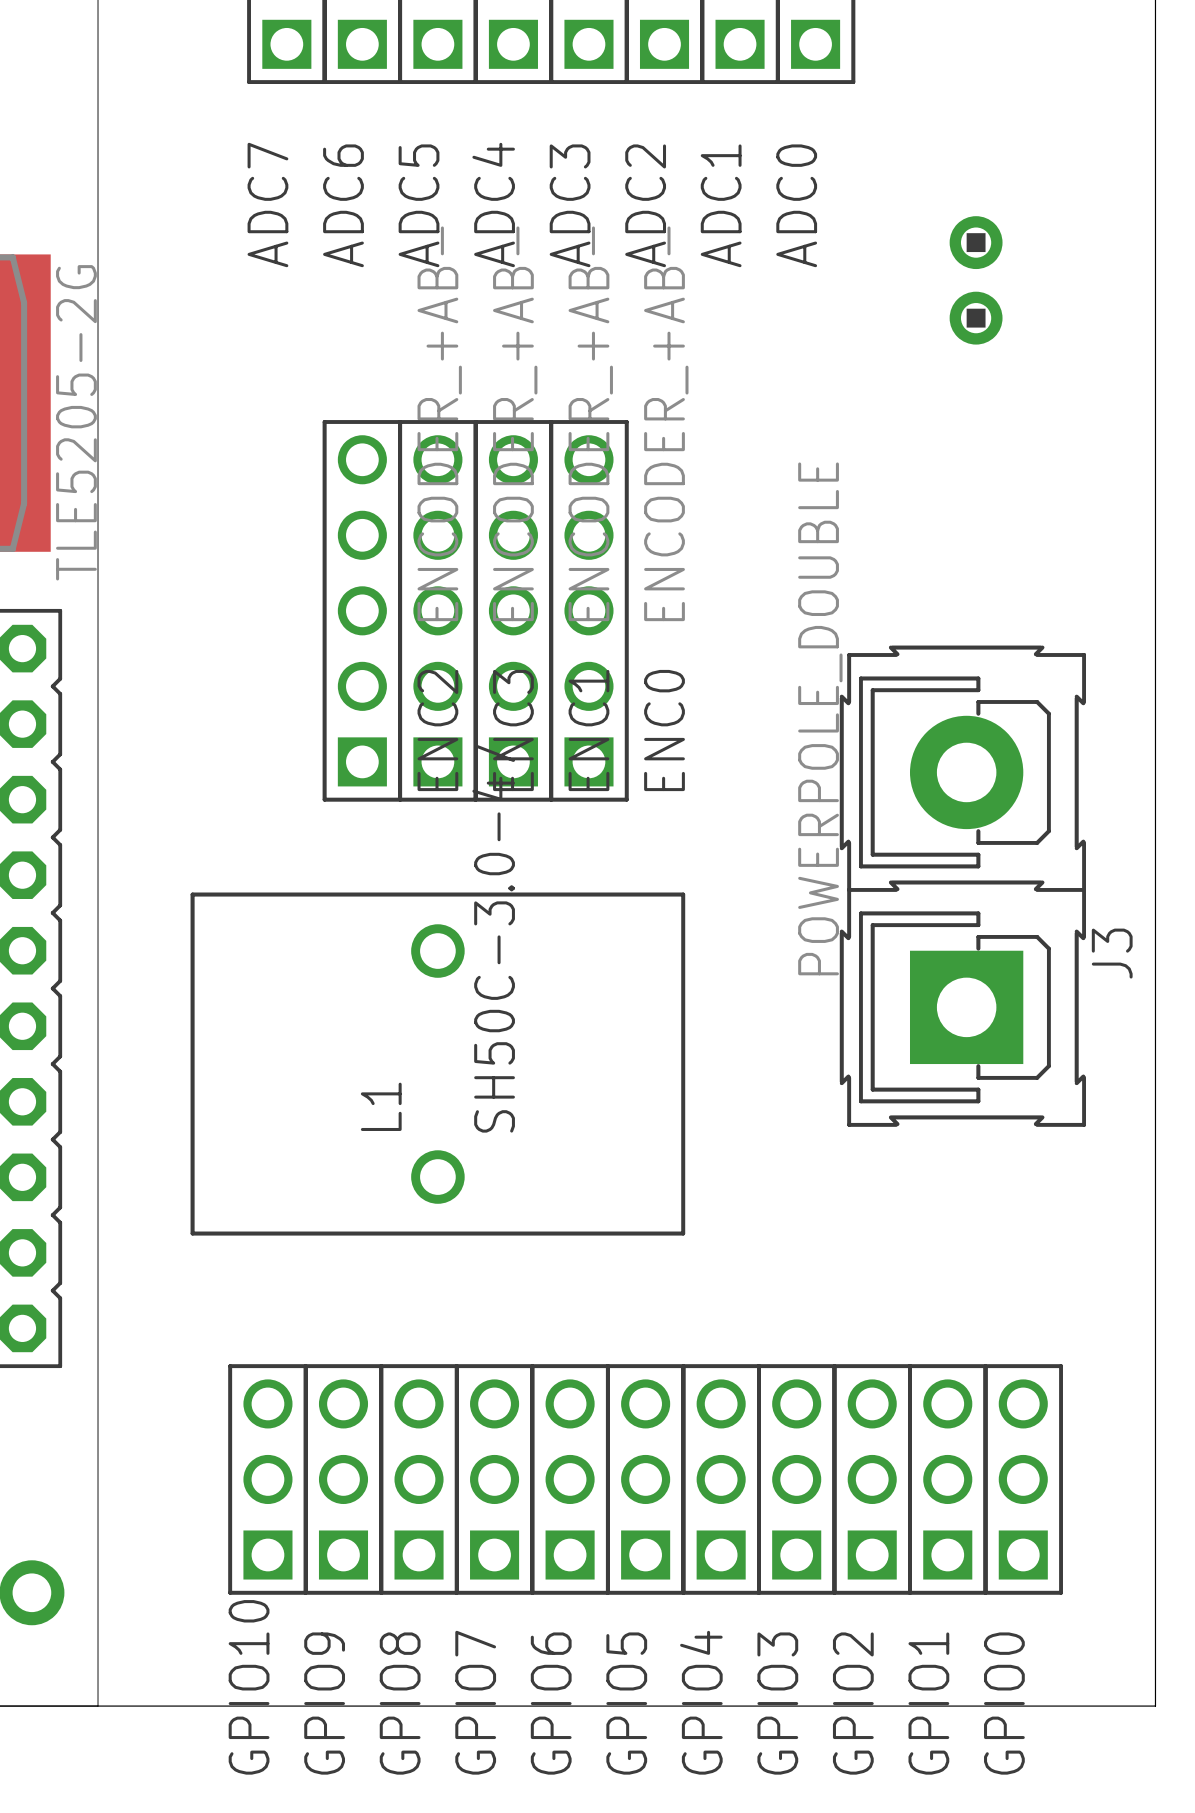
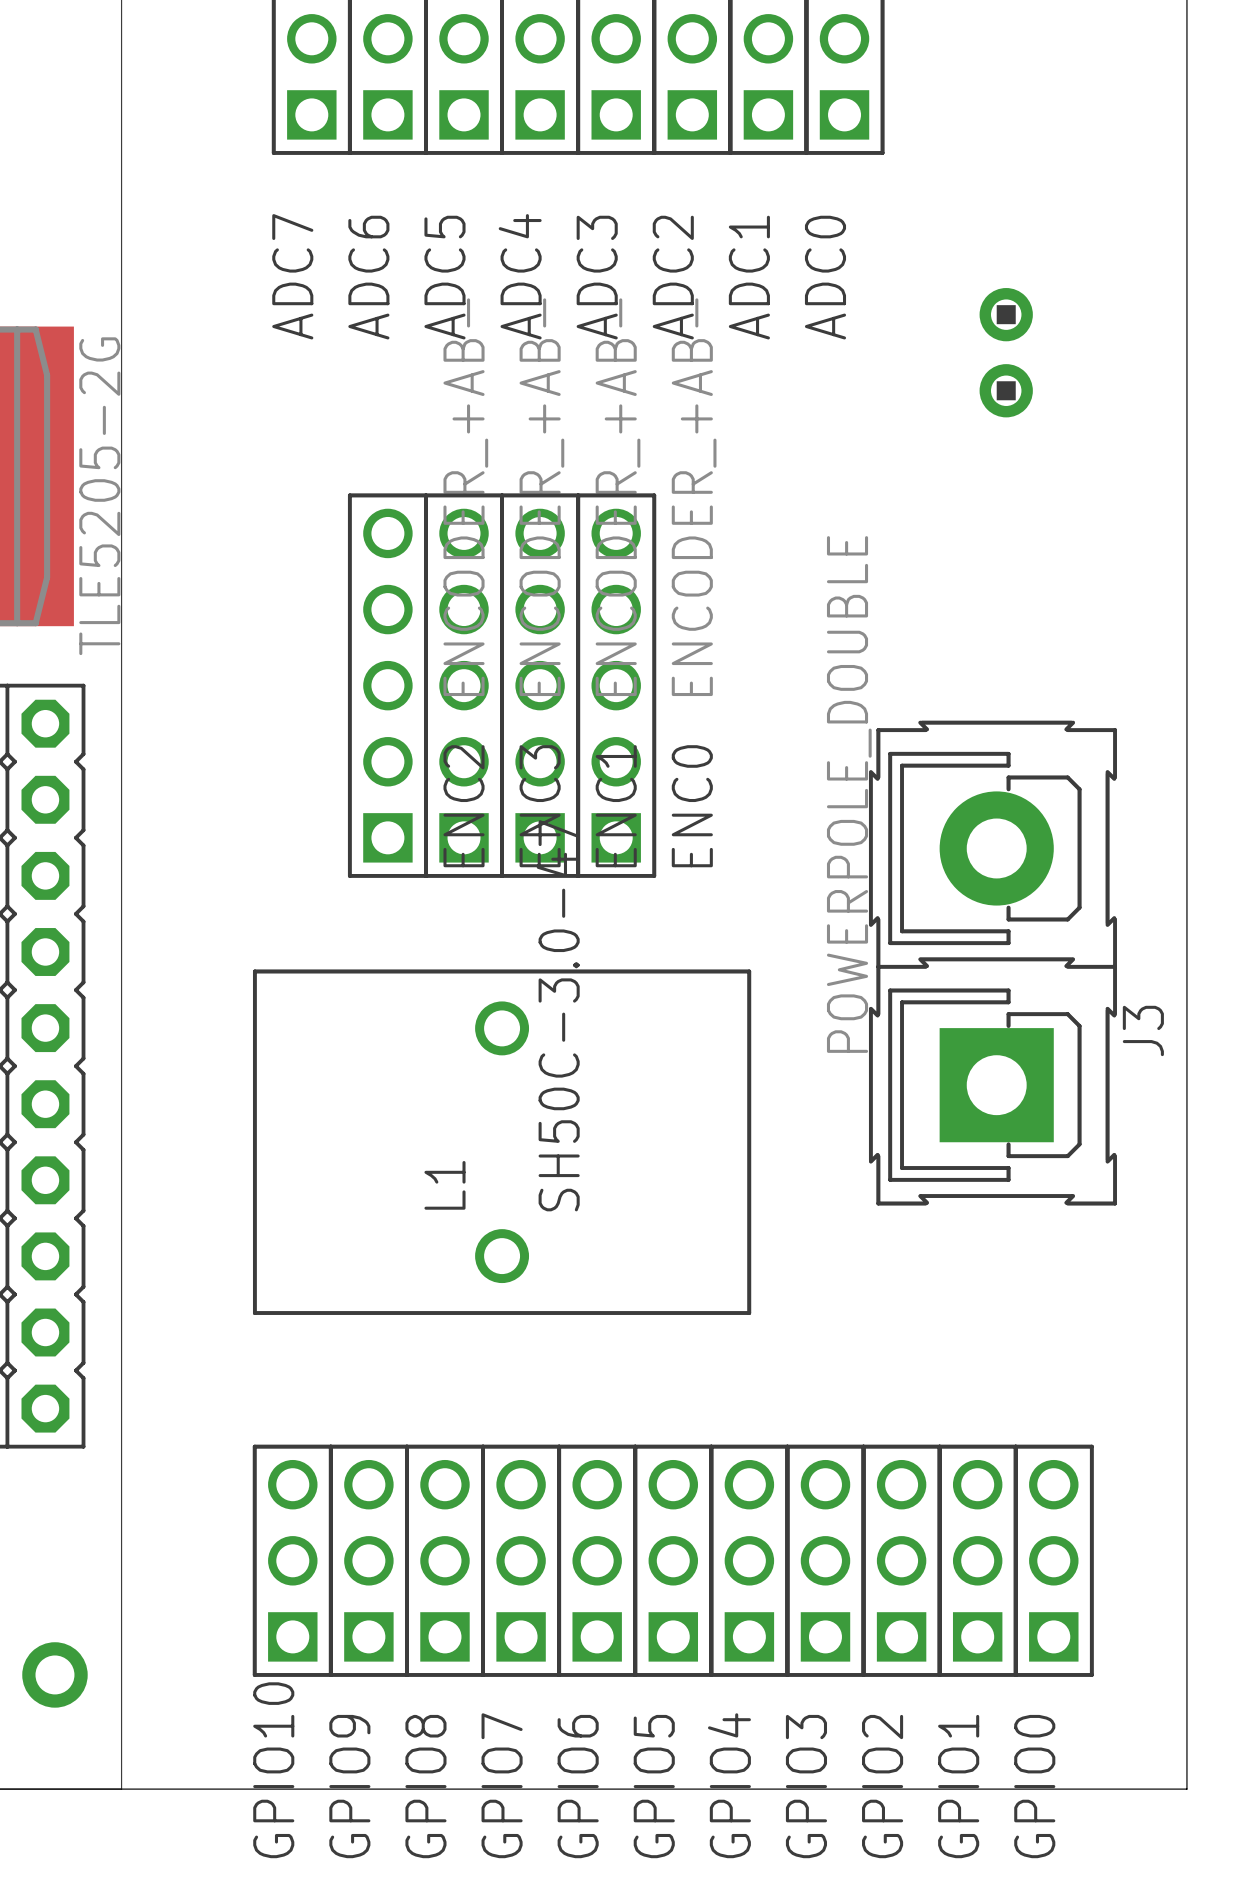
L1 position: (437, 1064) -> (502, 1142)

